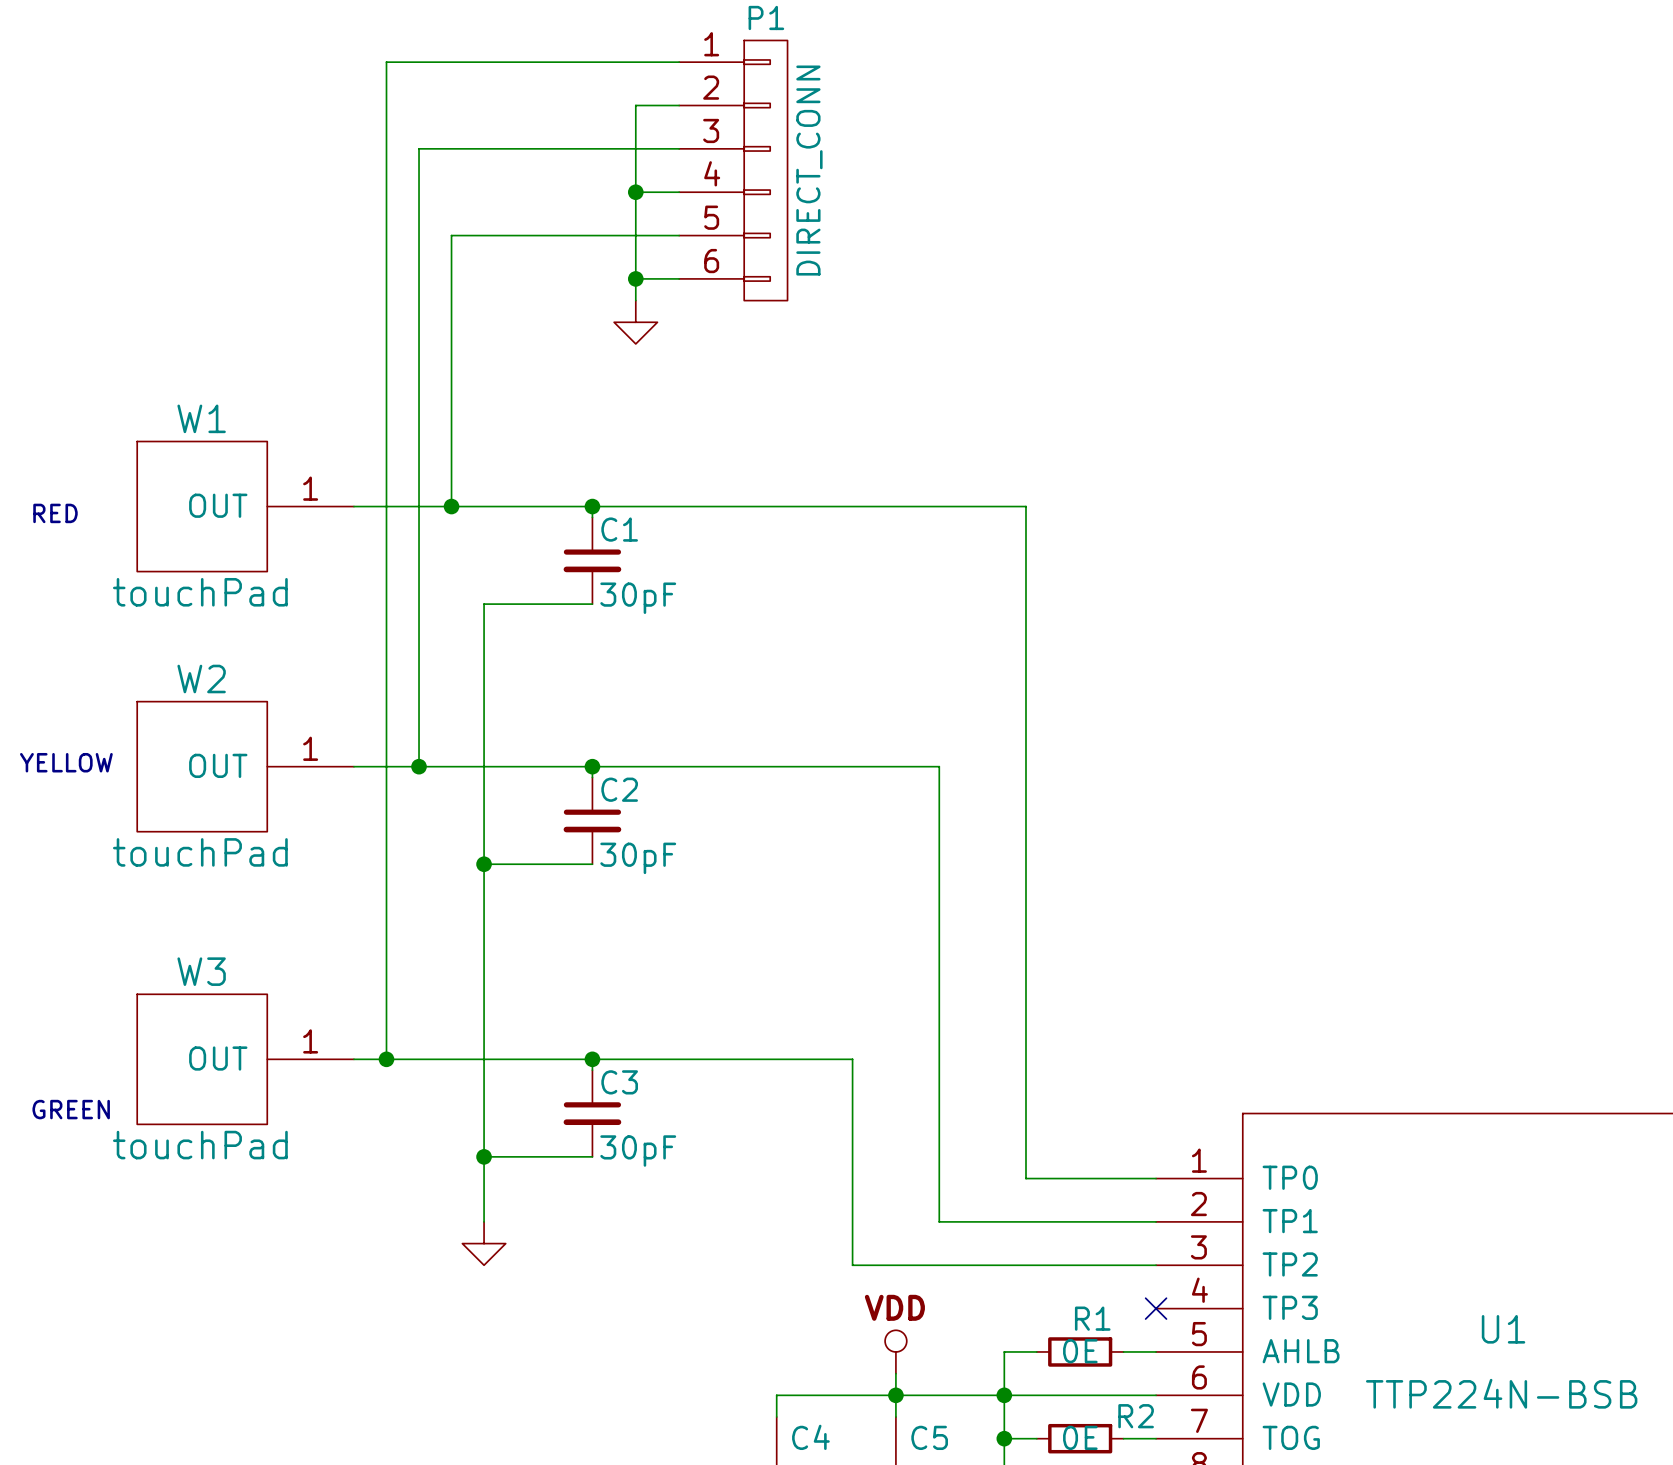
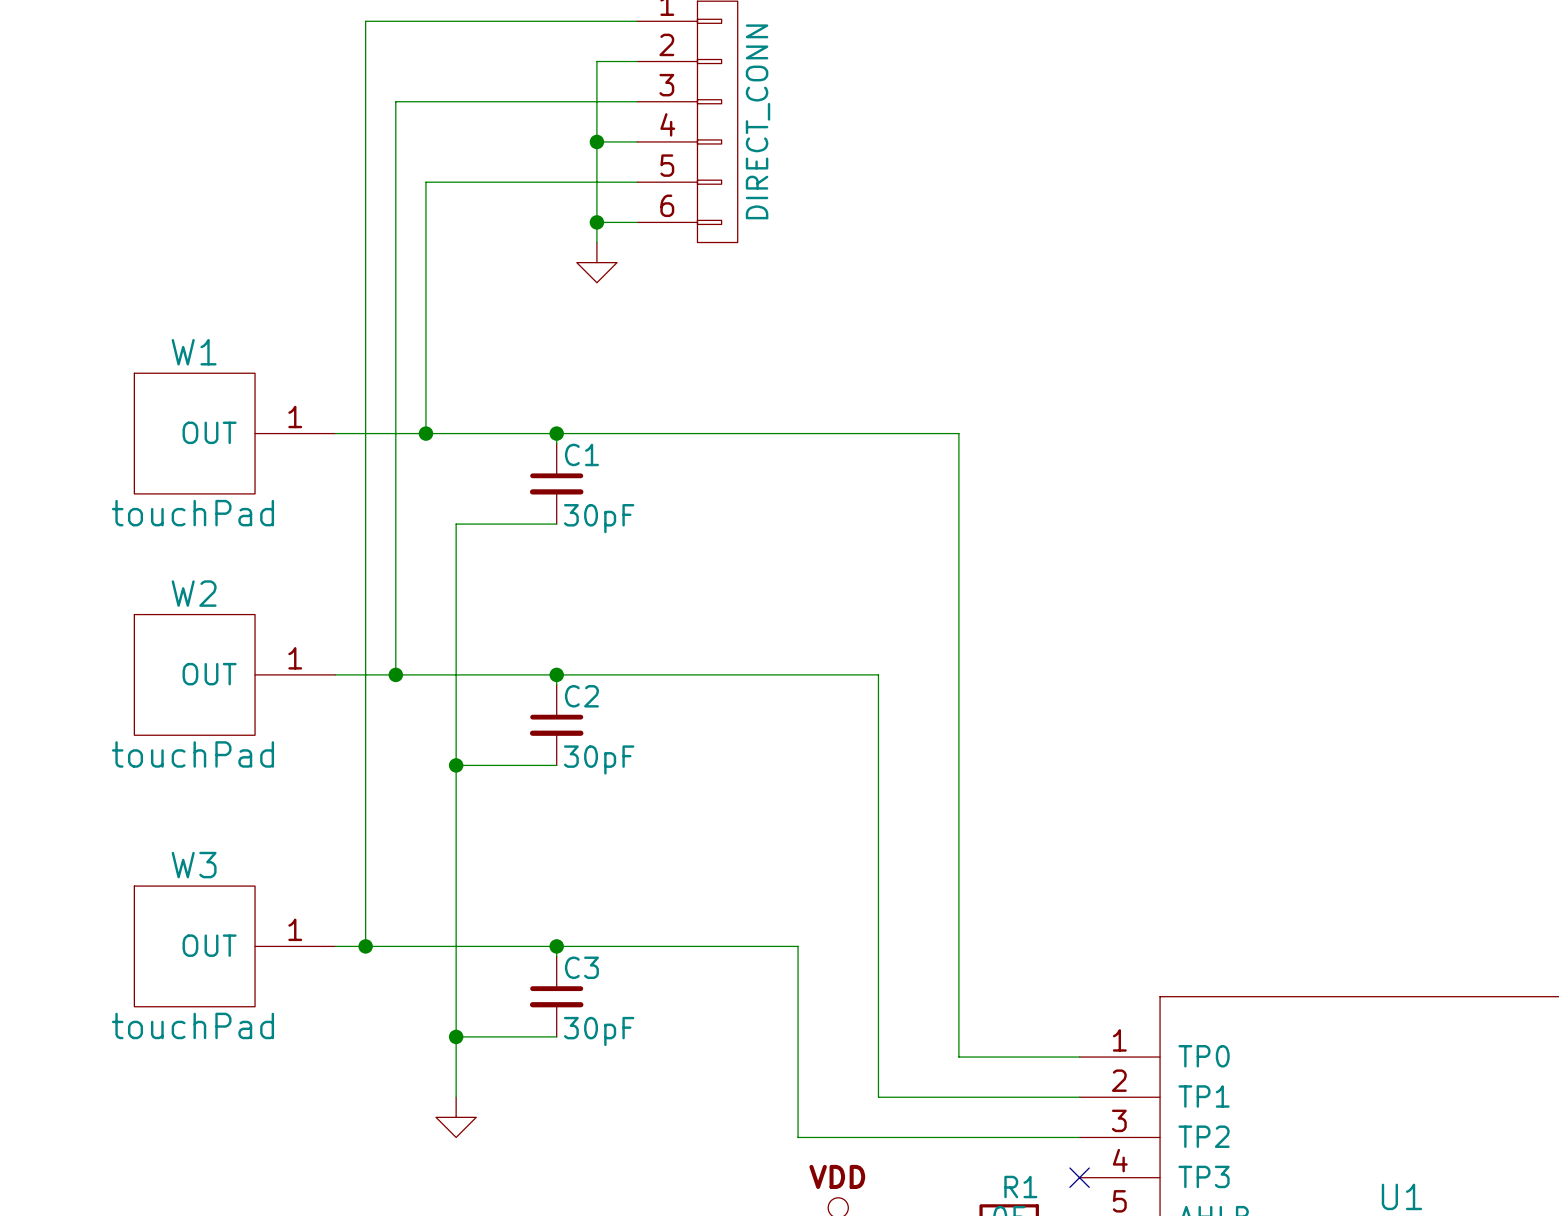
text: RED (55, 513) -> none
text: YELLOW (66, 762) -> none
text: GREEN (71, 1109) -> none

